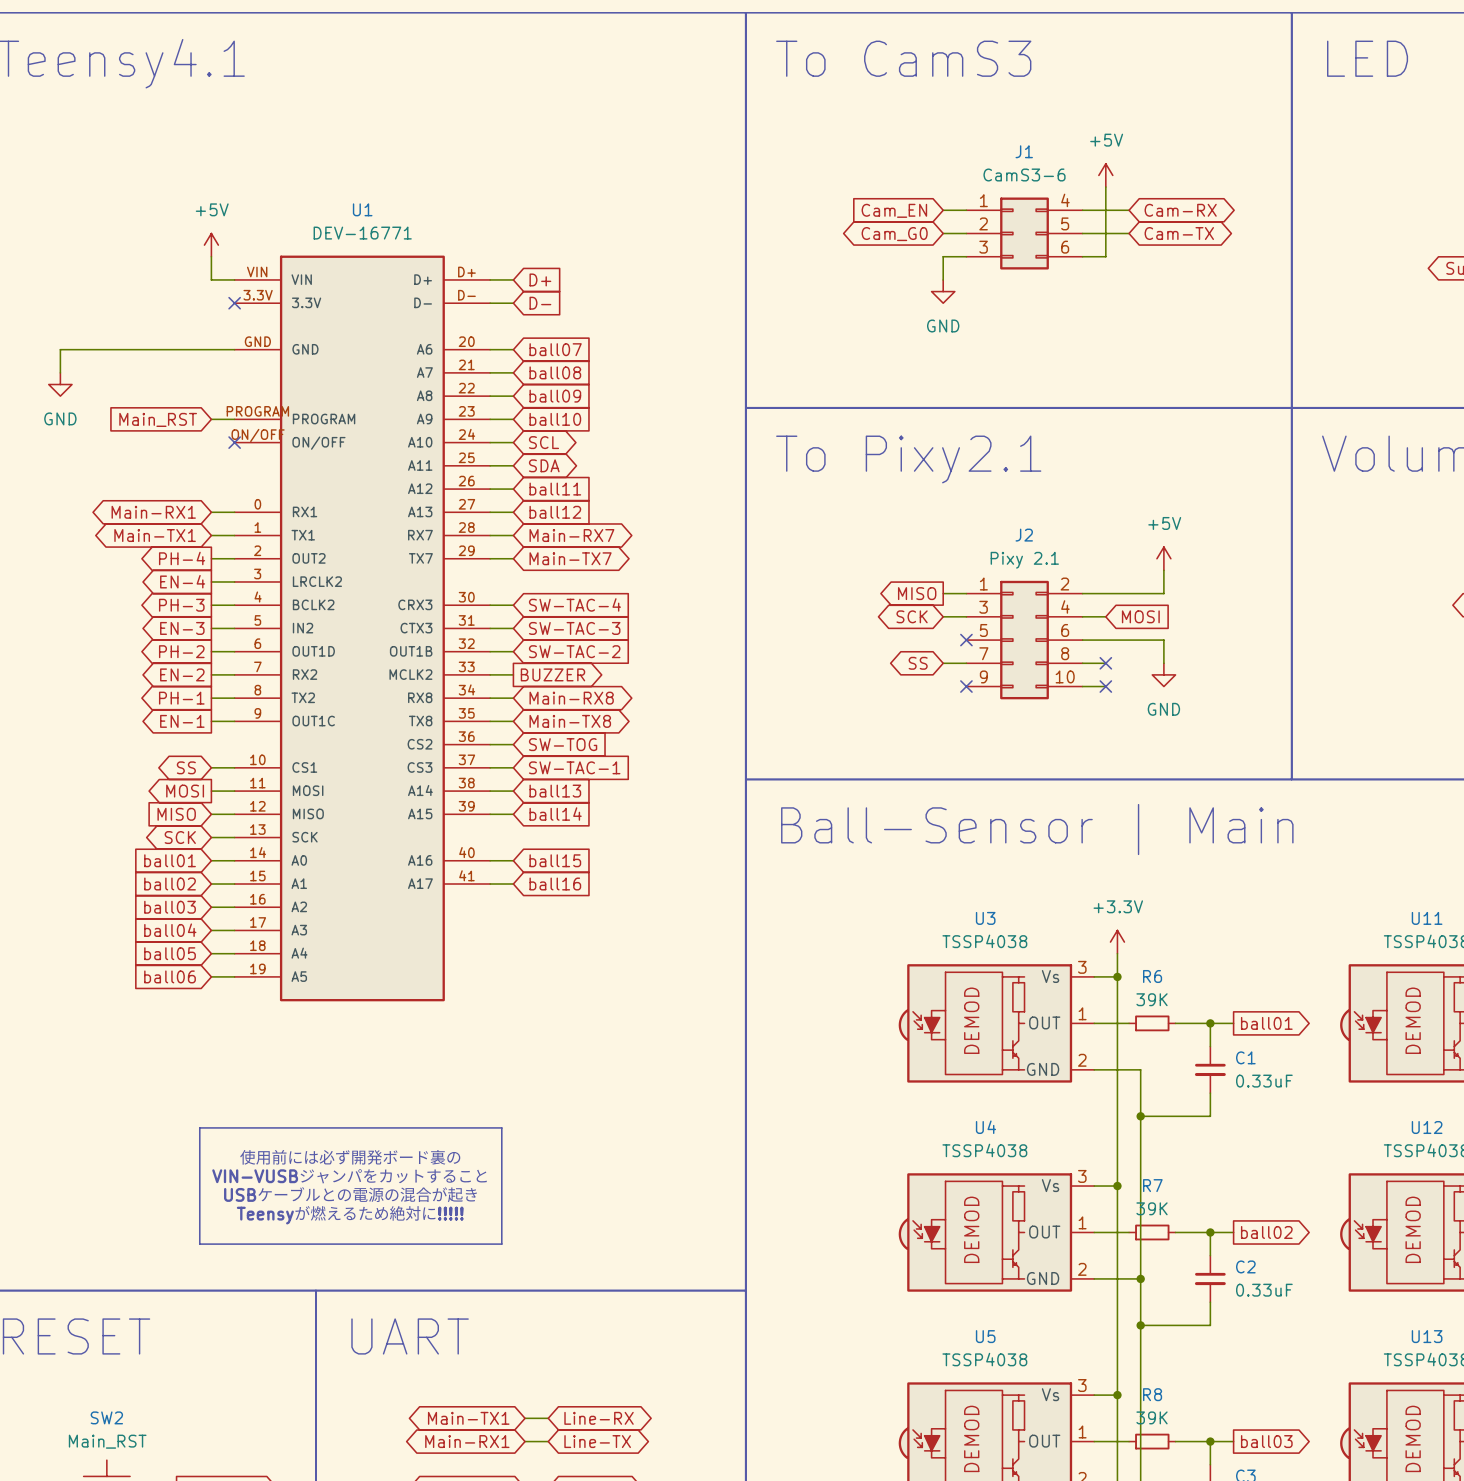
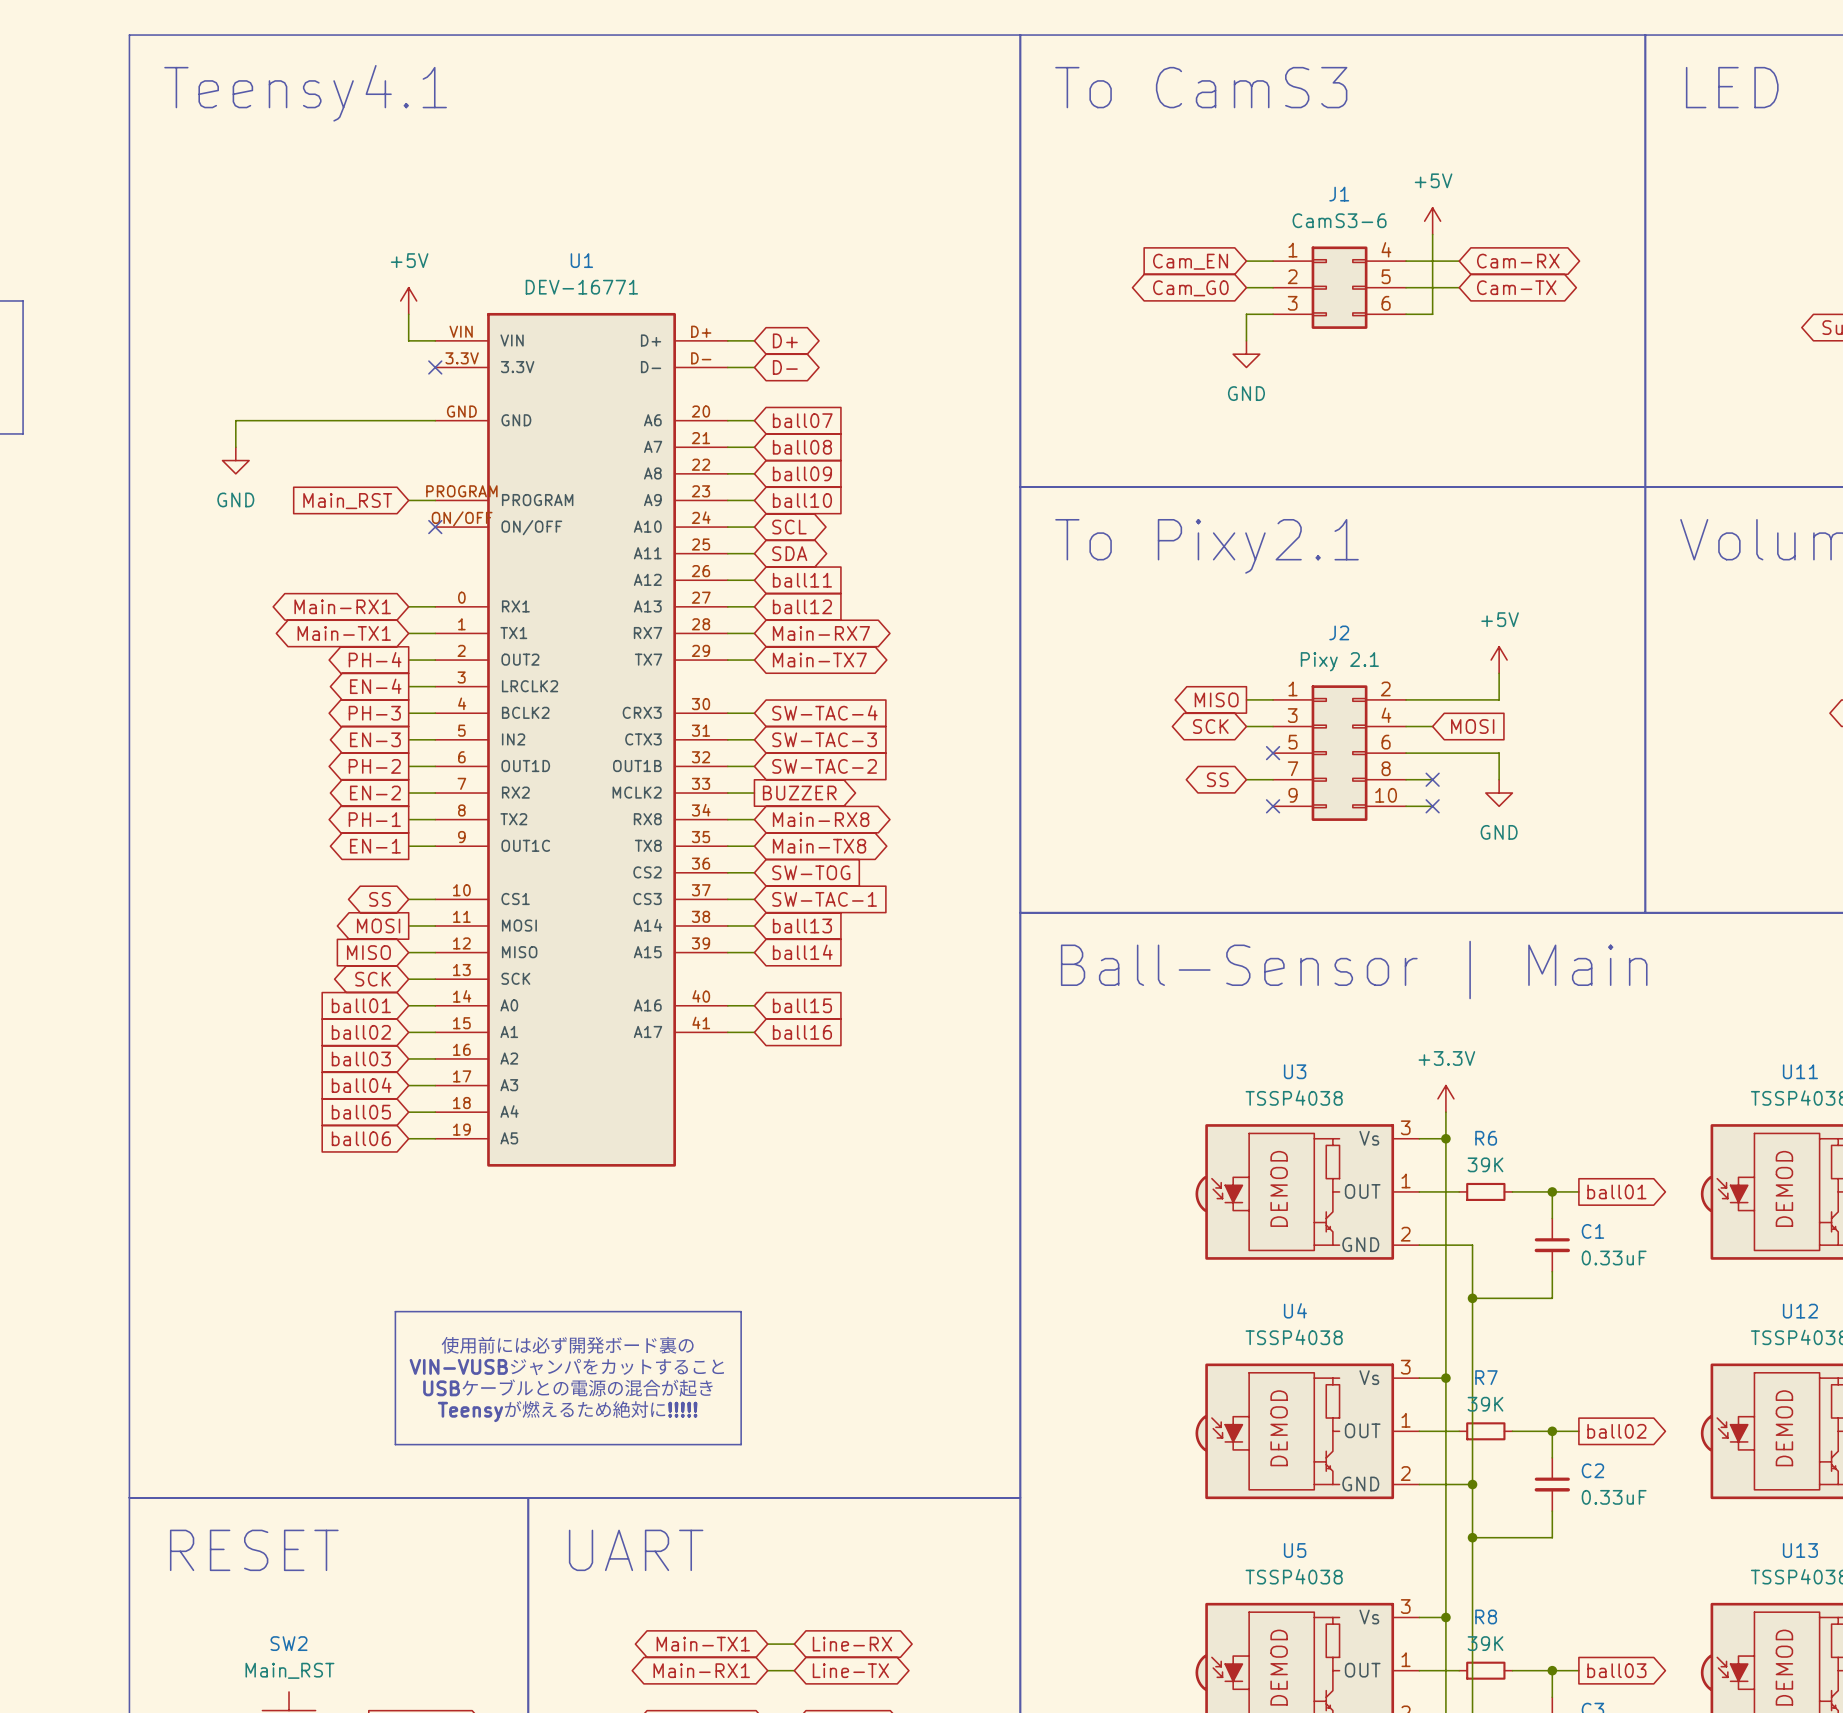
global label shape: input (540, 279) -> bidirectional (785, 340)
global label shape: input (540, 303) -> bidirectional (785, 367)

